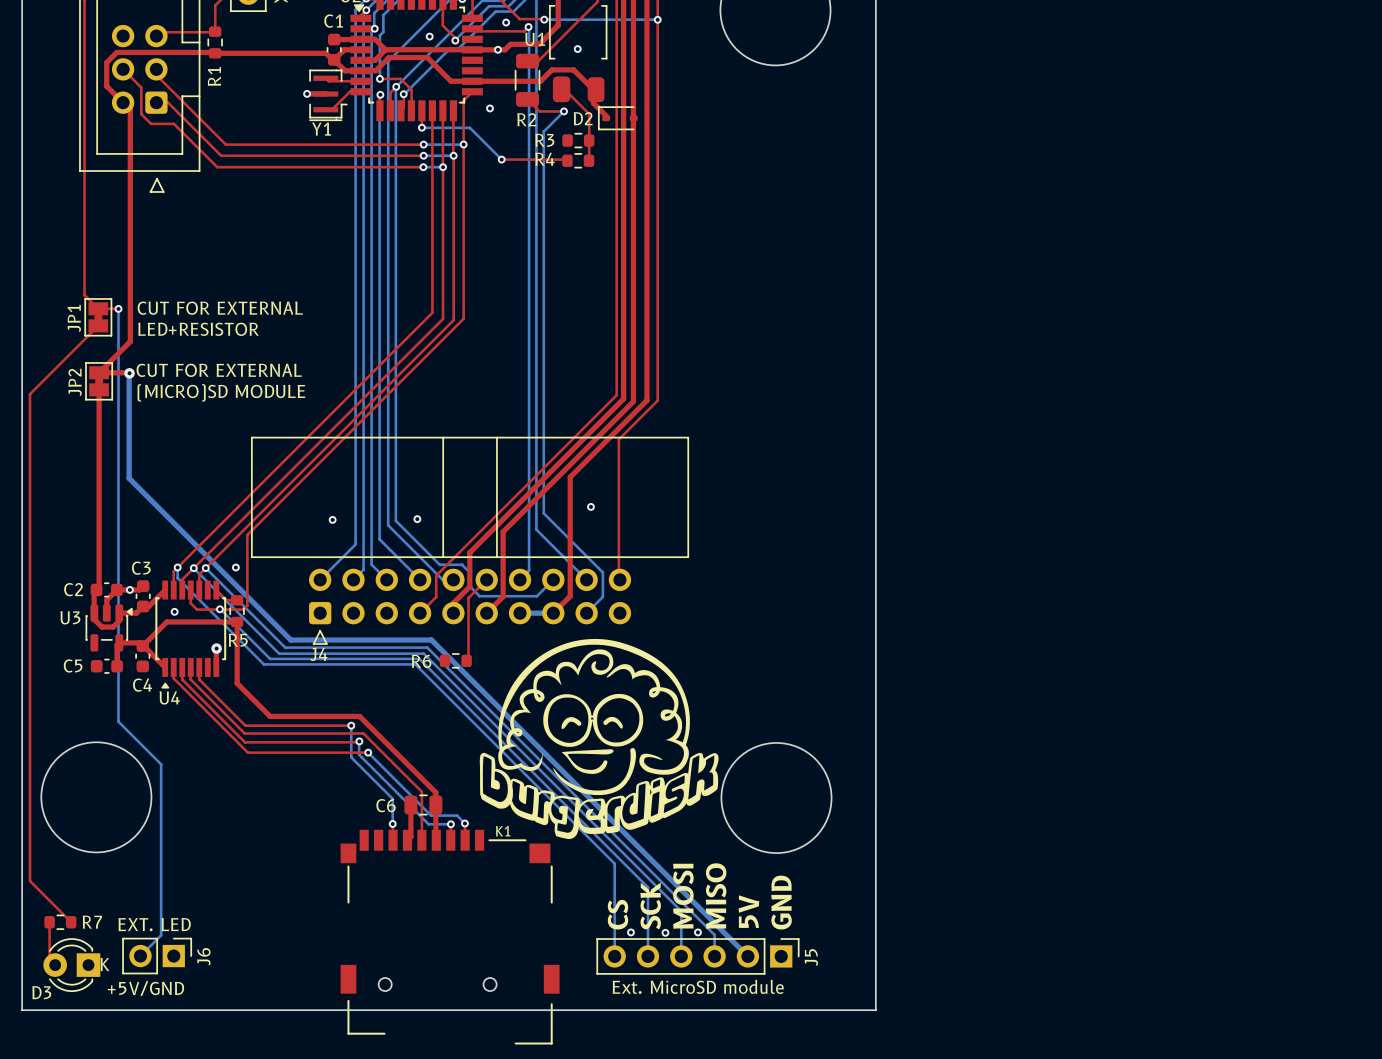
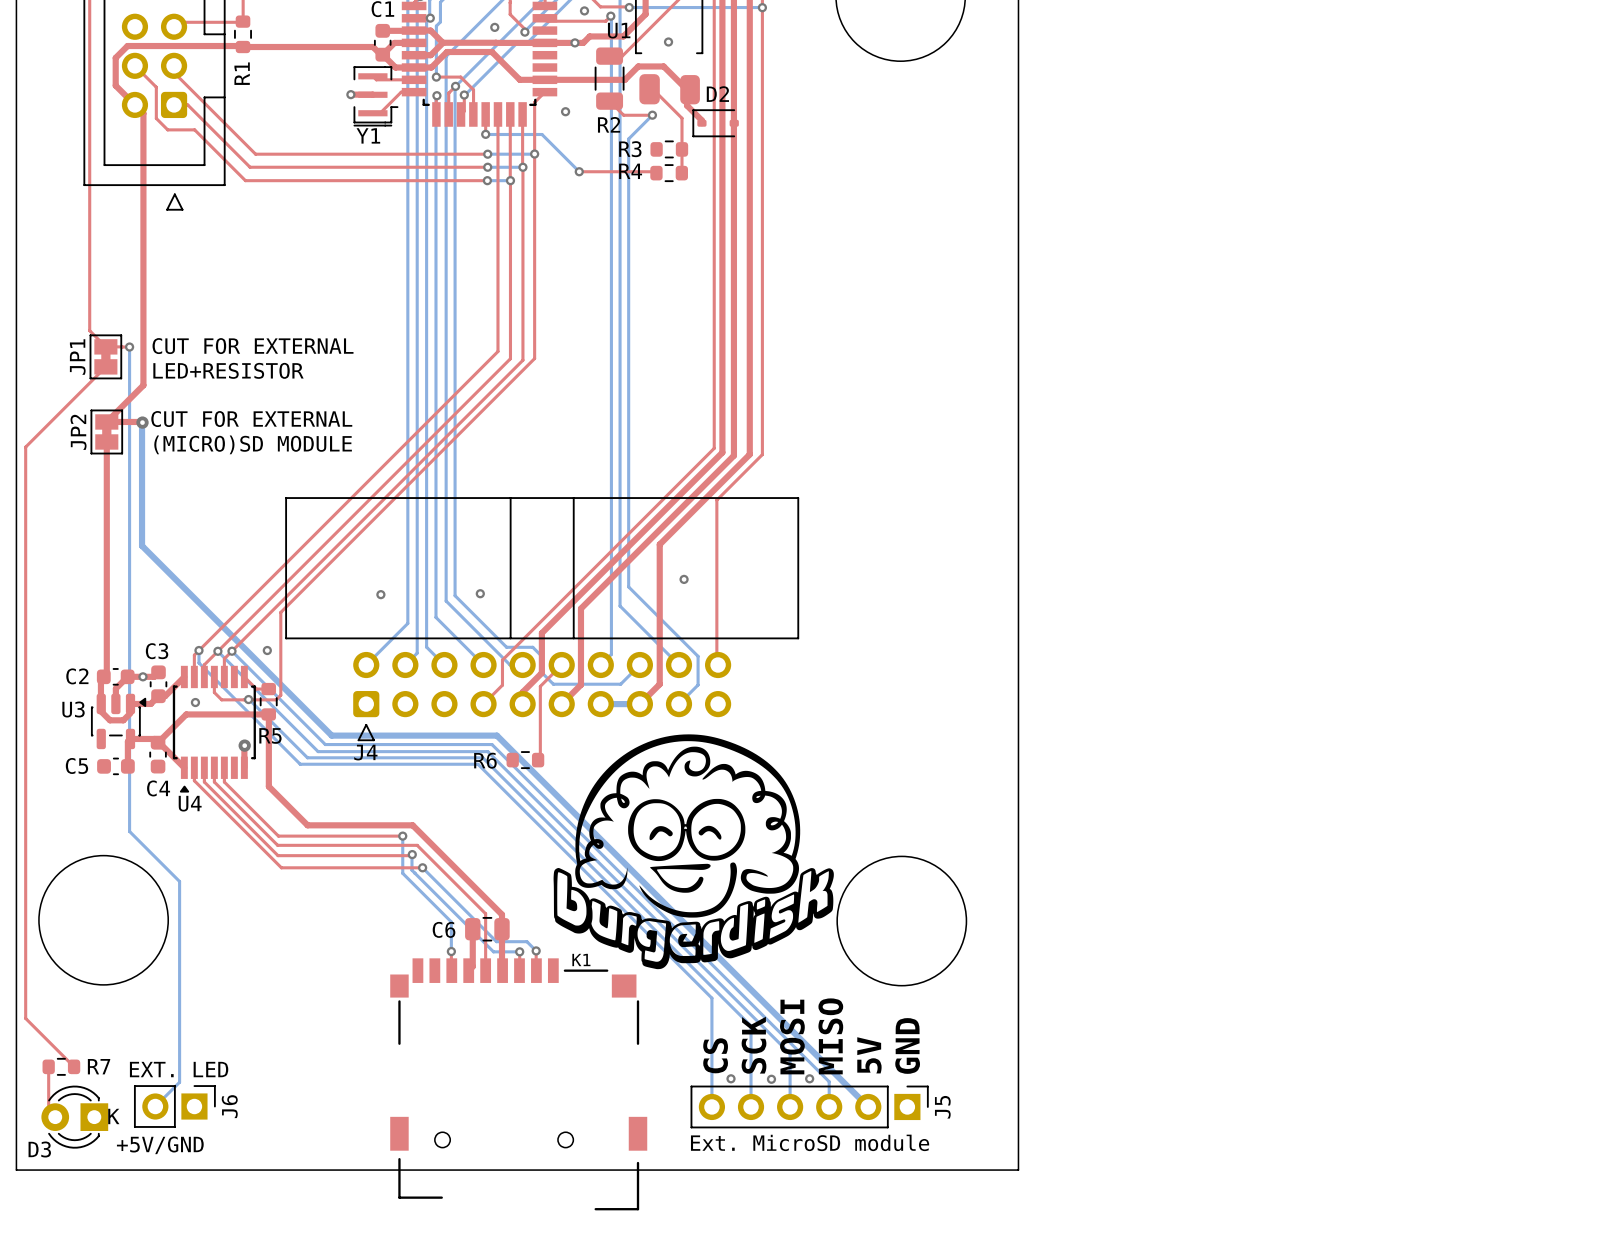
D2 name position: D2 (583, 118) -> D2 (717, 94)

